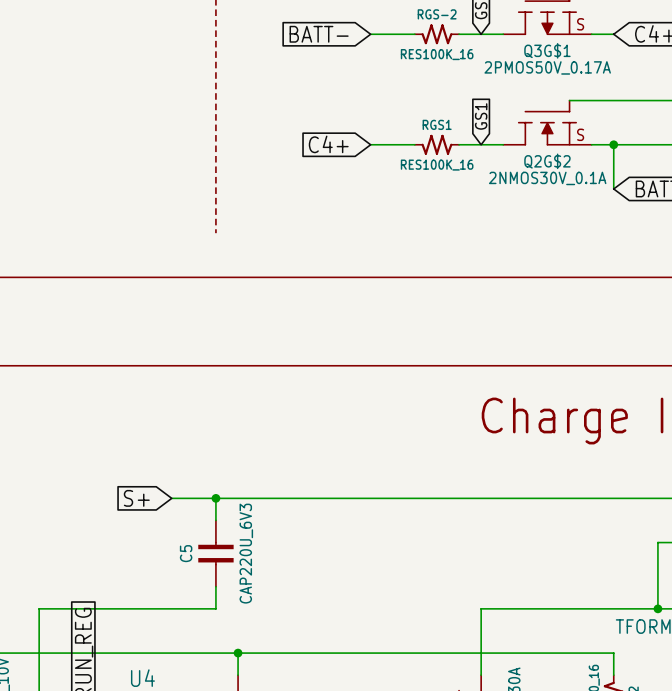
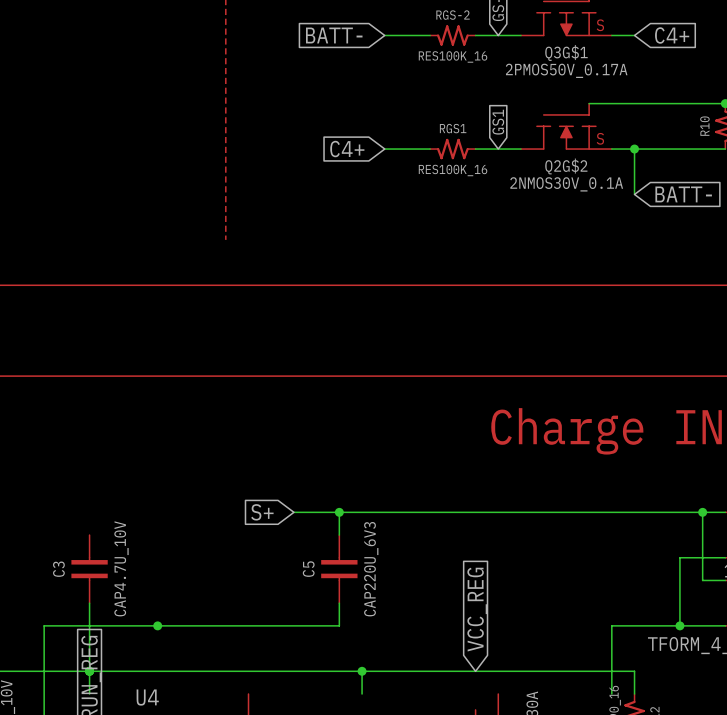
global label position: S+ (136, 498) -> S+ (262, 512)
wire: (171, 498) (282, 498) -> none
wire: (215, 498) (215, 520) -> (339, 512) (339, 535)
junction: (215, 498) -> none
junction: none -> (339, 512)
C3: none -> CAP4.7U_10V (89, 569)
C5 position: (215, 553) -> (339, 569)
wire: none -> (89, 603) (89, 694)
wire: (215, 586) (215, 608) -> (339, 603) (339, 625) (225, 625)
global label: none -> VCC_REG (477, 609)
junction: none -> (157, 625)
wire: (591, 608) (481, 608) (481, 675) -> (611, 625) (611, 694)
junction: none -> (89, 671)
wire: (238, 653) (238, 675) -> (362, 671) (362, 694)
junction: (238, 653) -> none
junction: none -> (362, 671)

